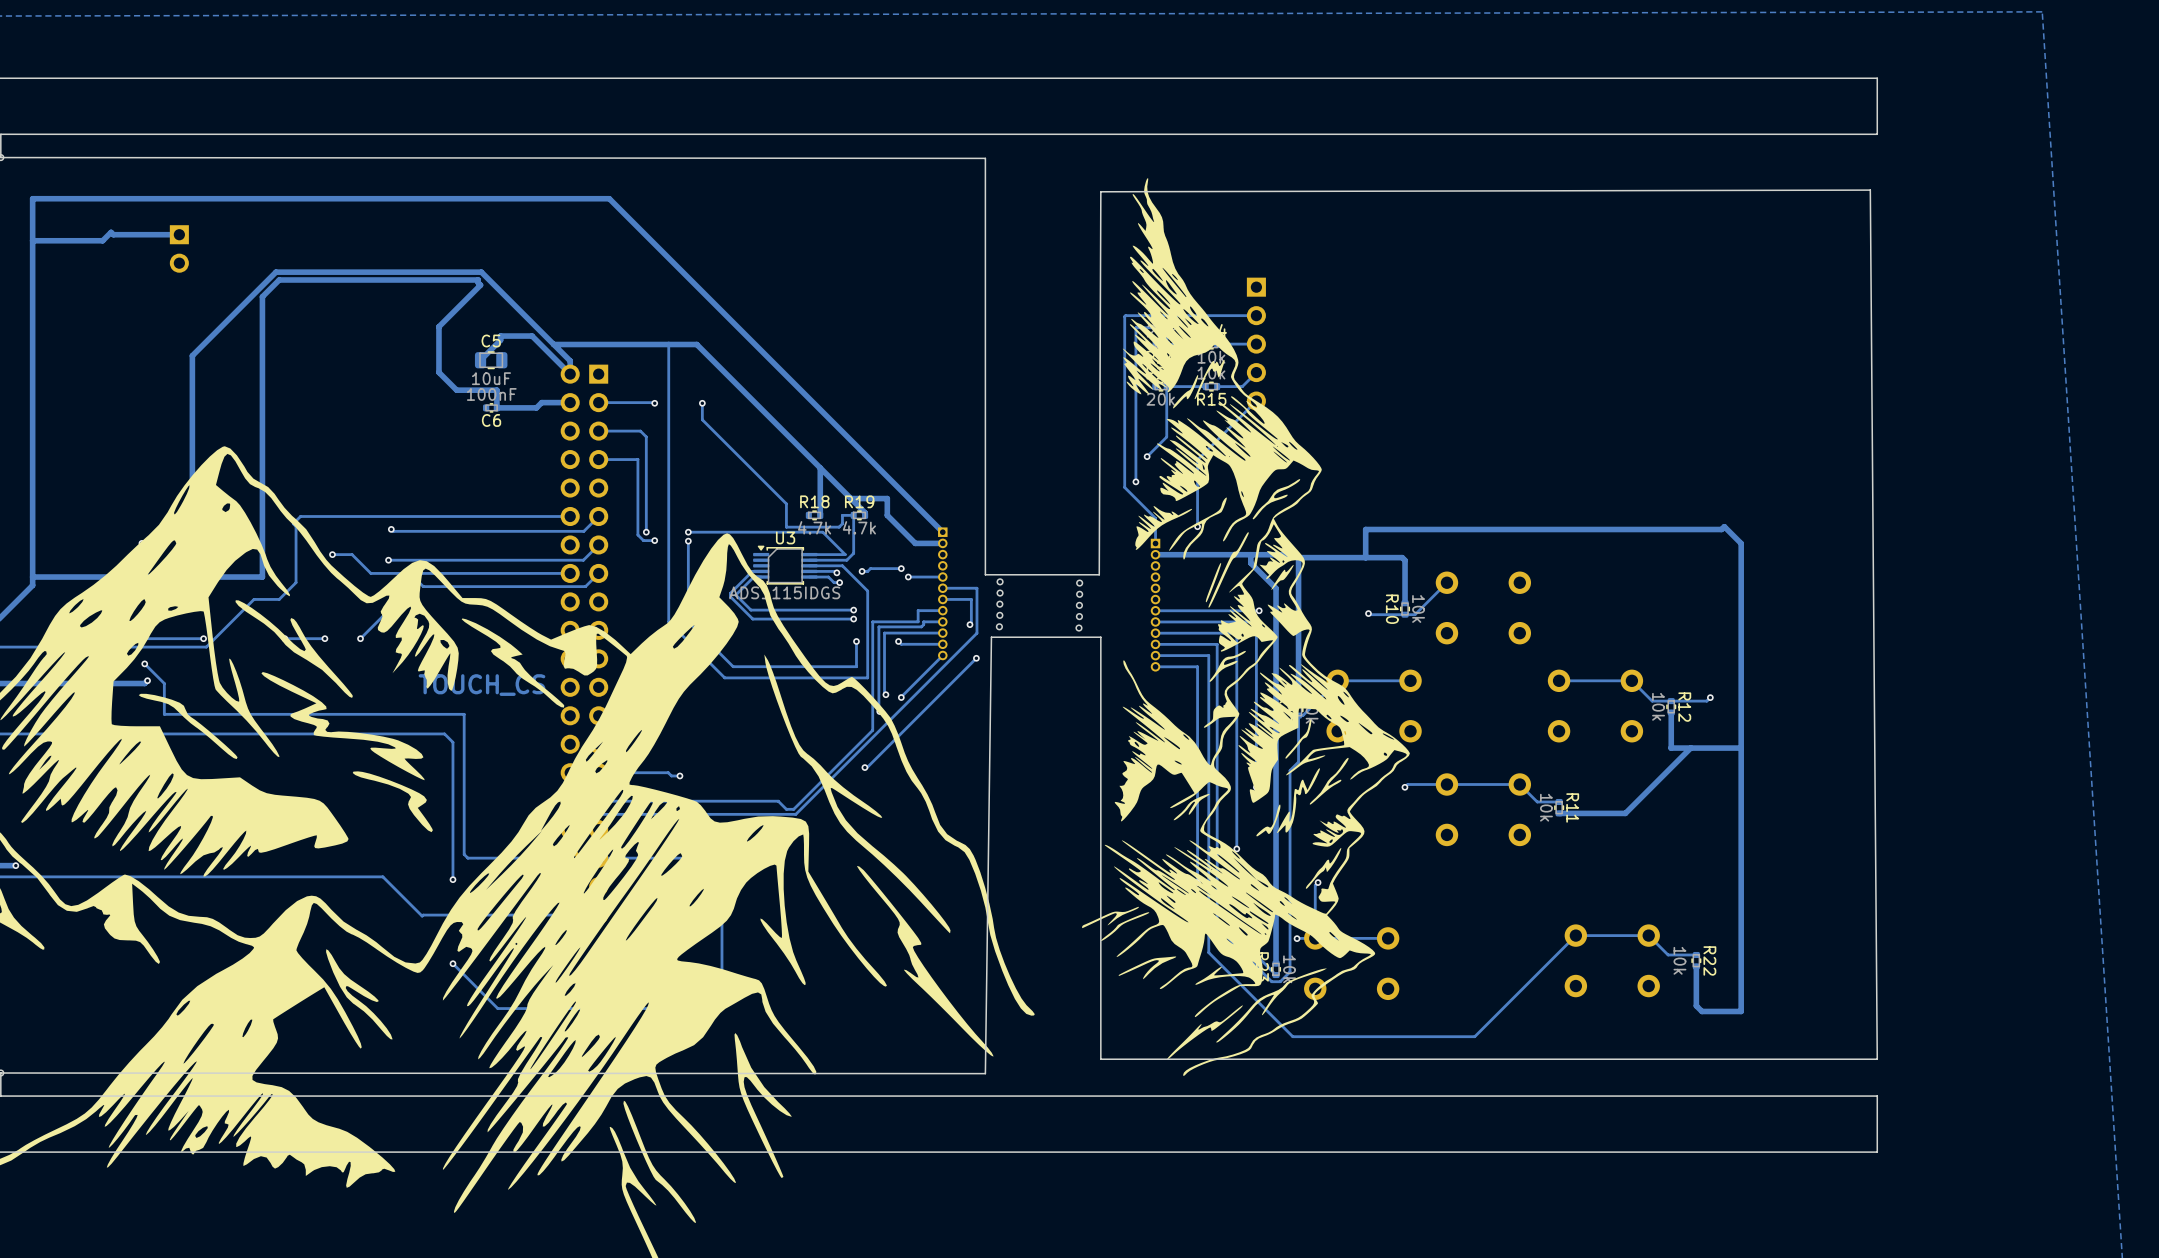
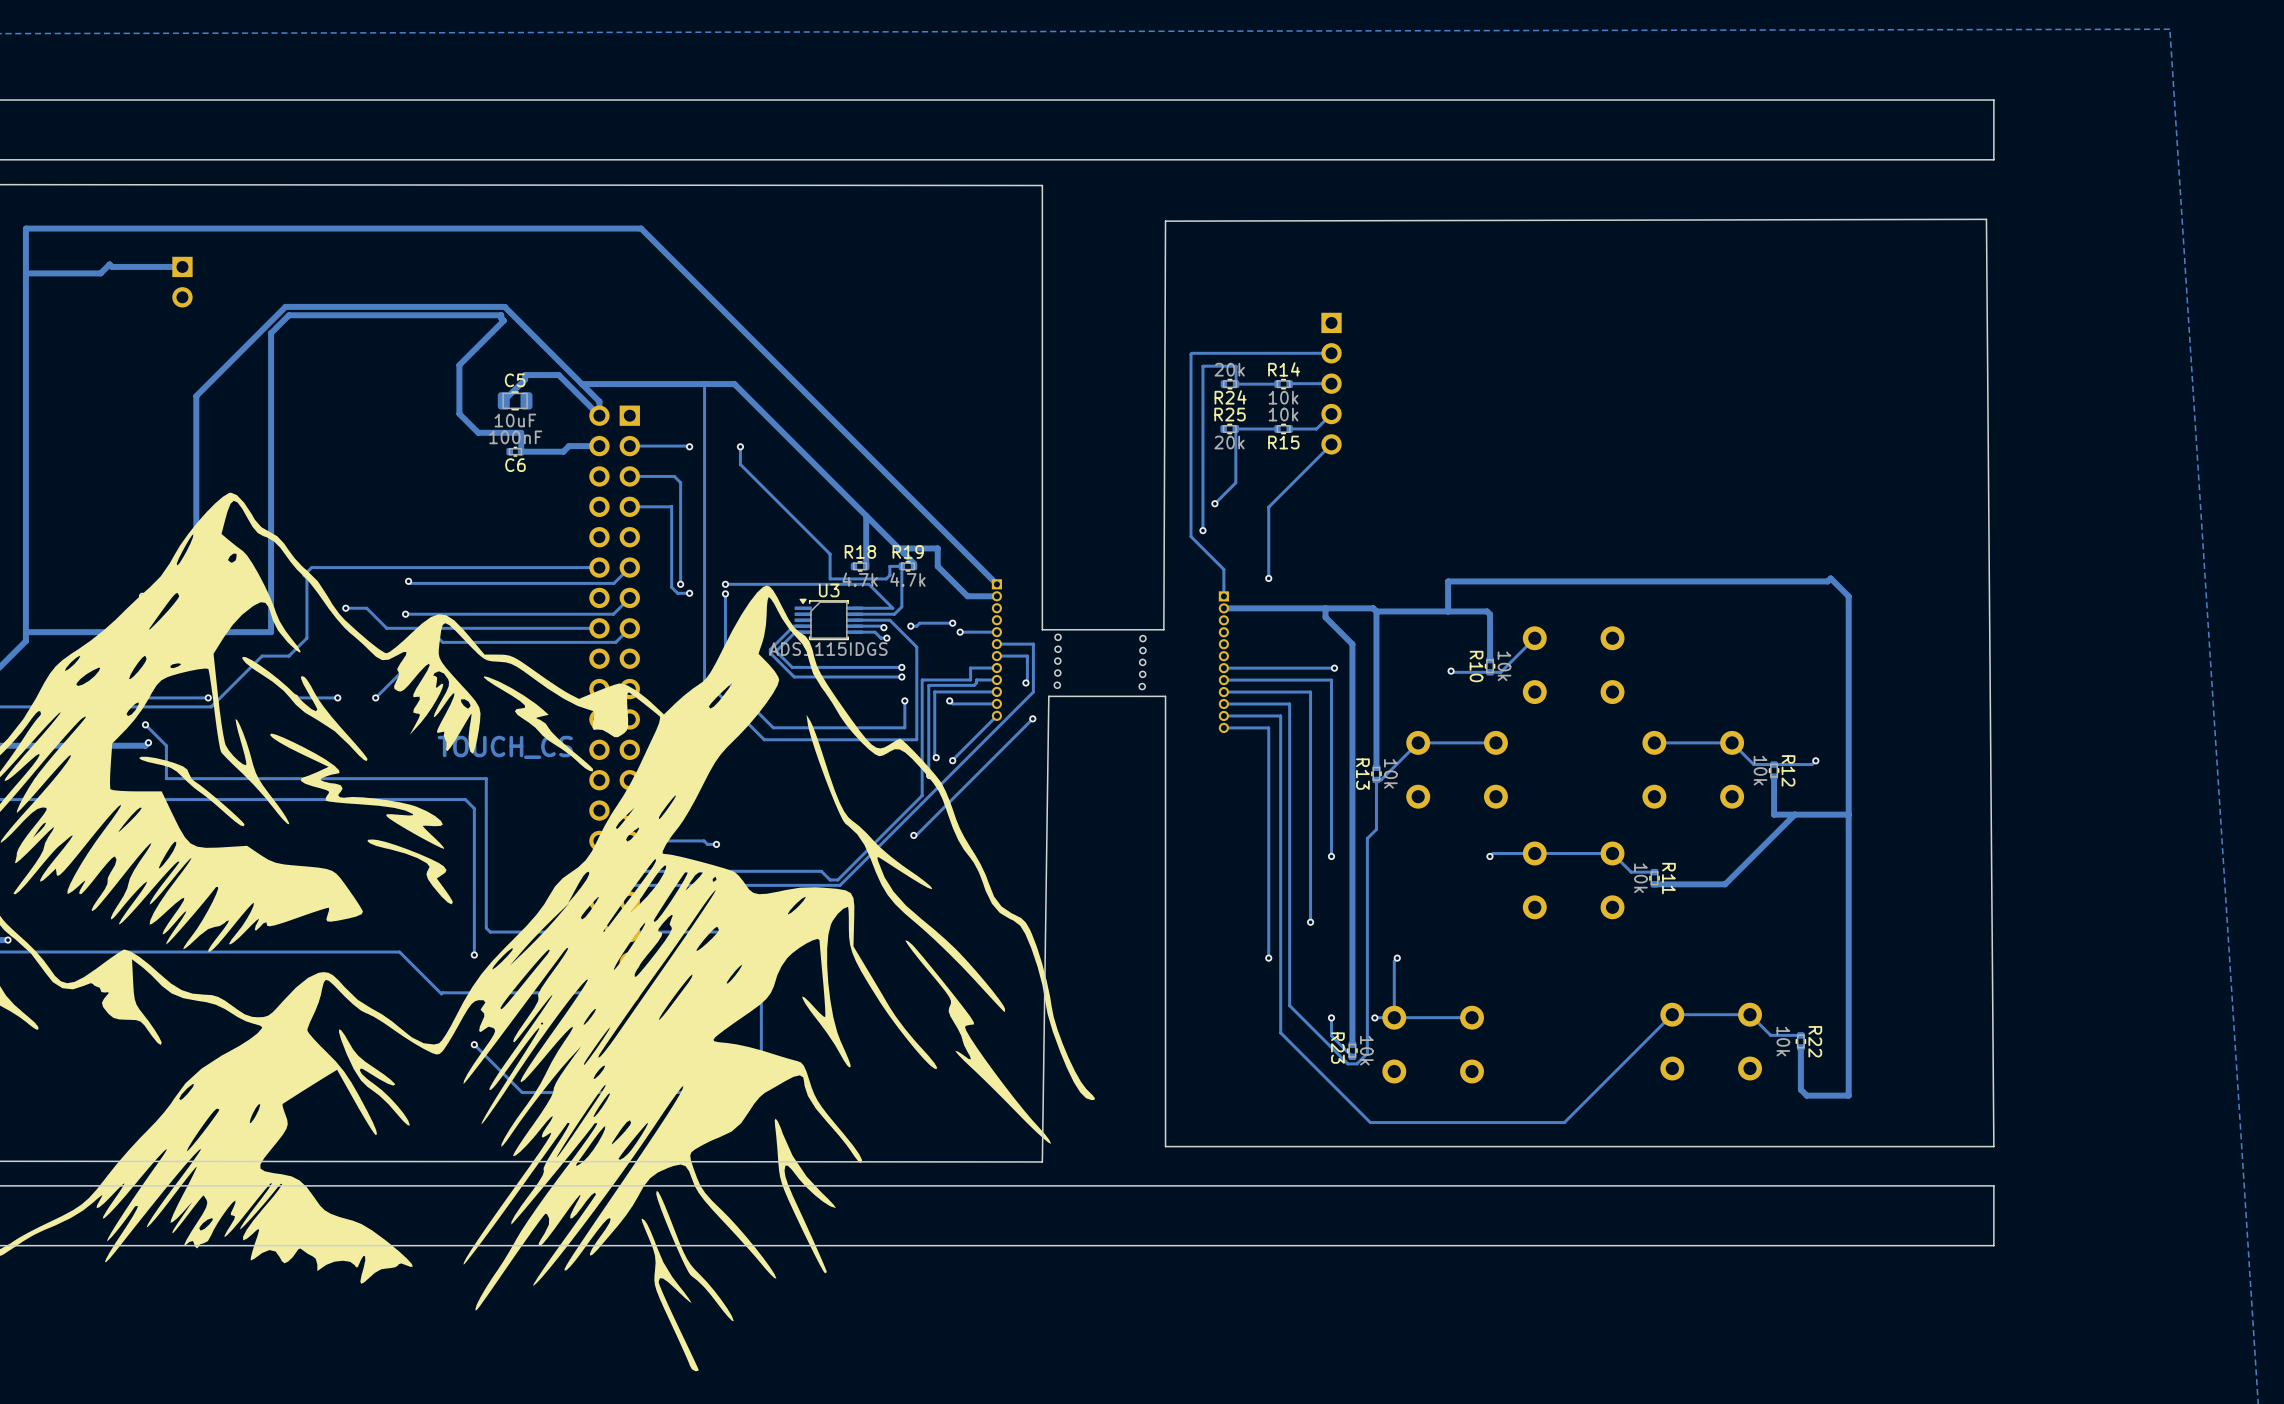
drawing: [1082, 178, 1410, 1077] -> none

